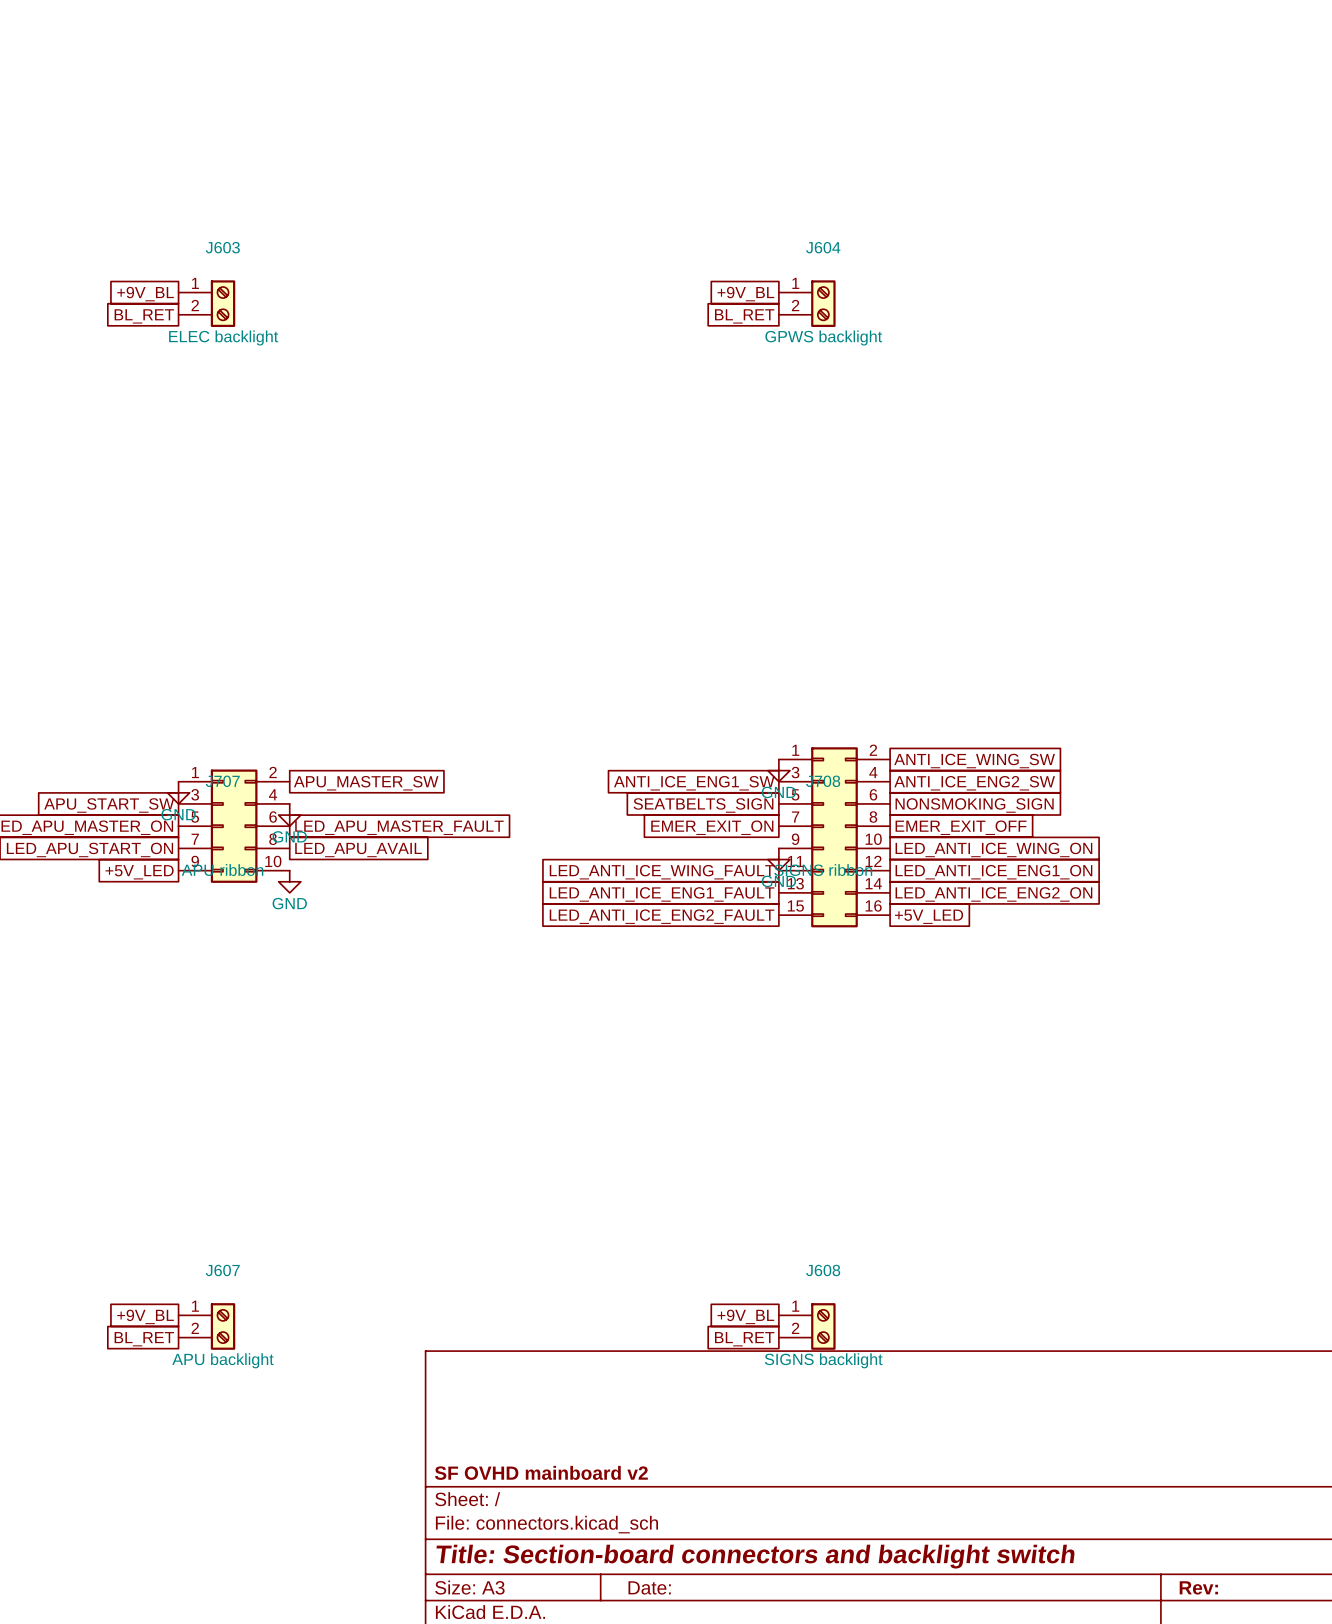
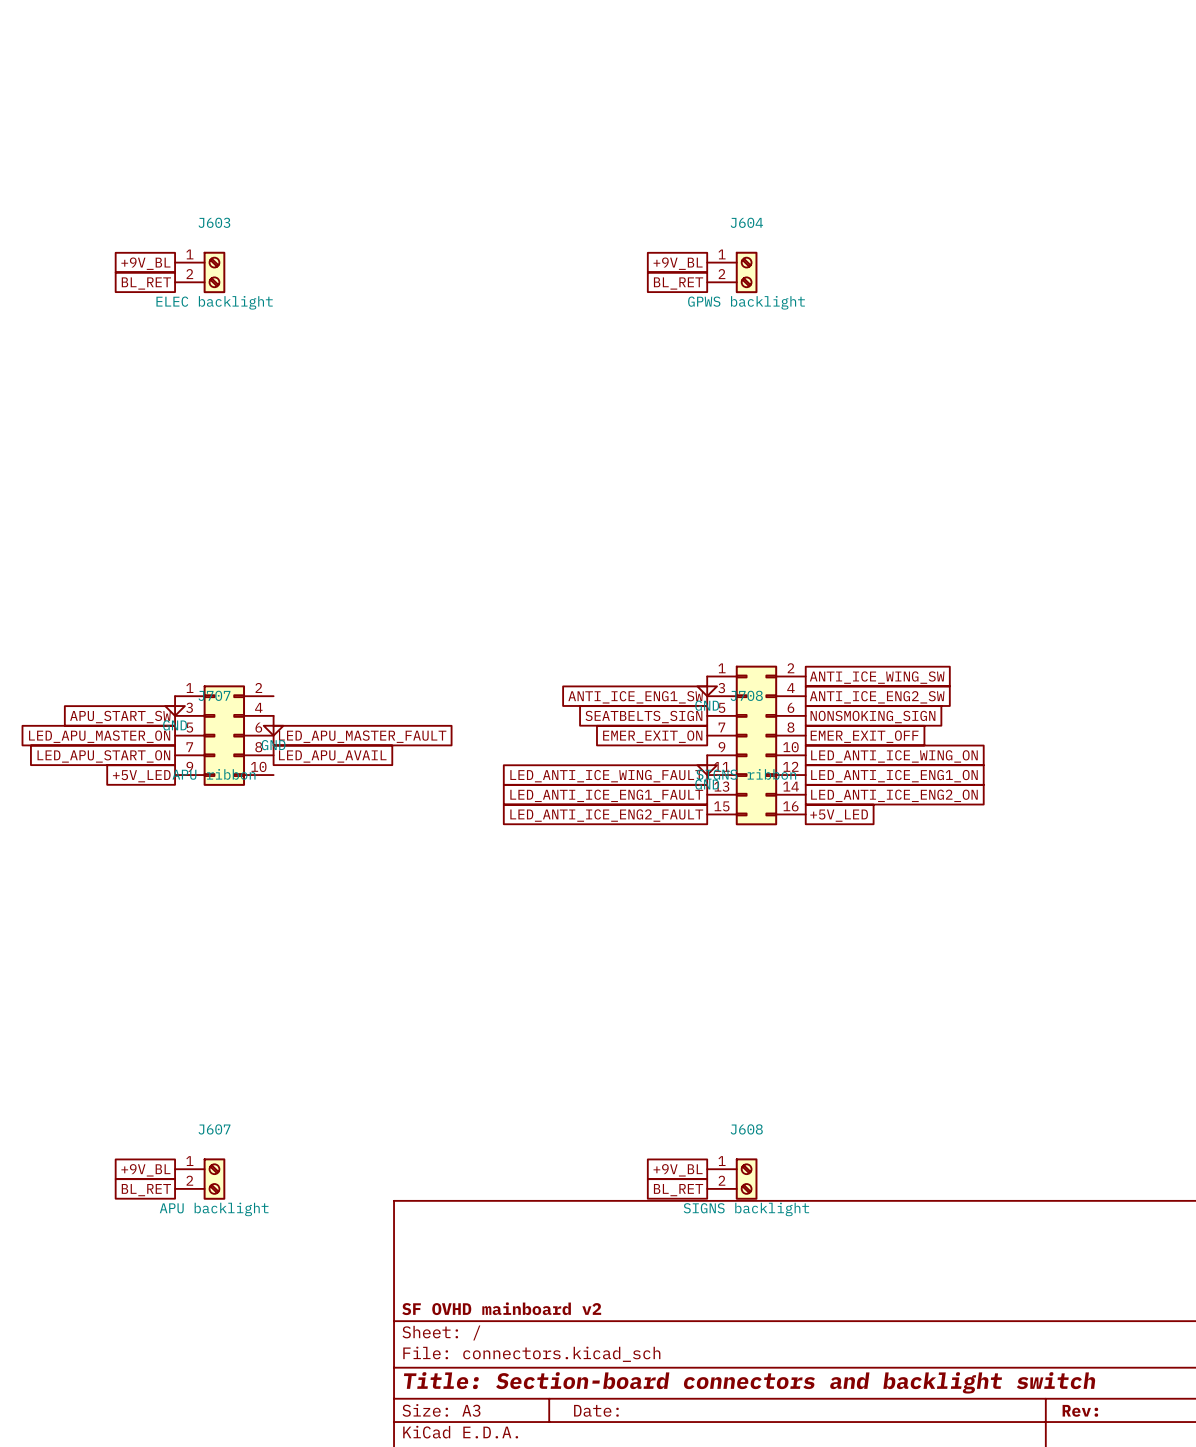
global label: APU_MASTER_SW (366, 783) -> none
power symbol: GND (289, 881) -> none

